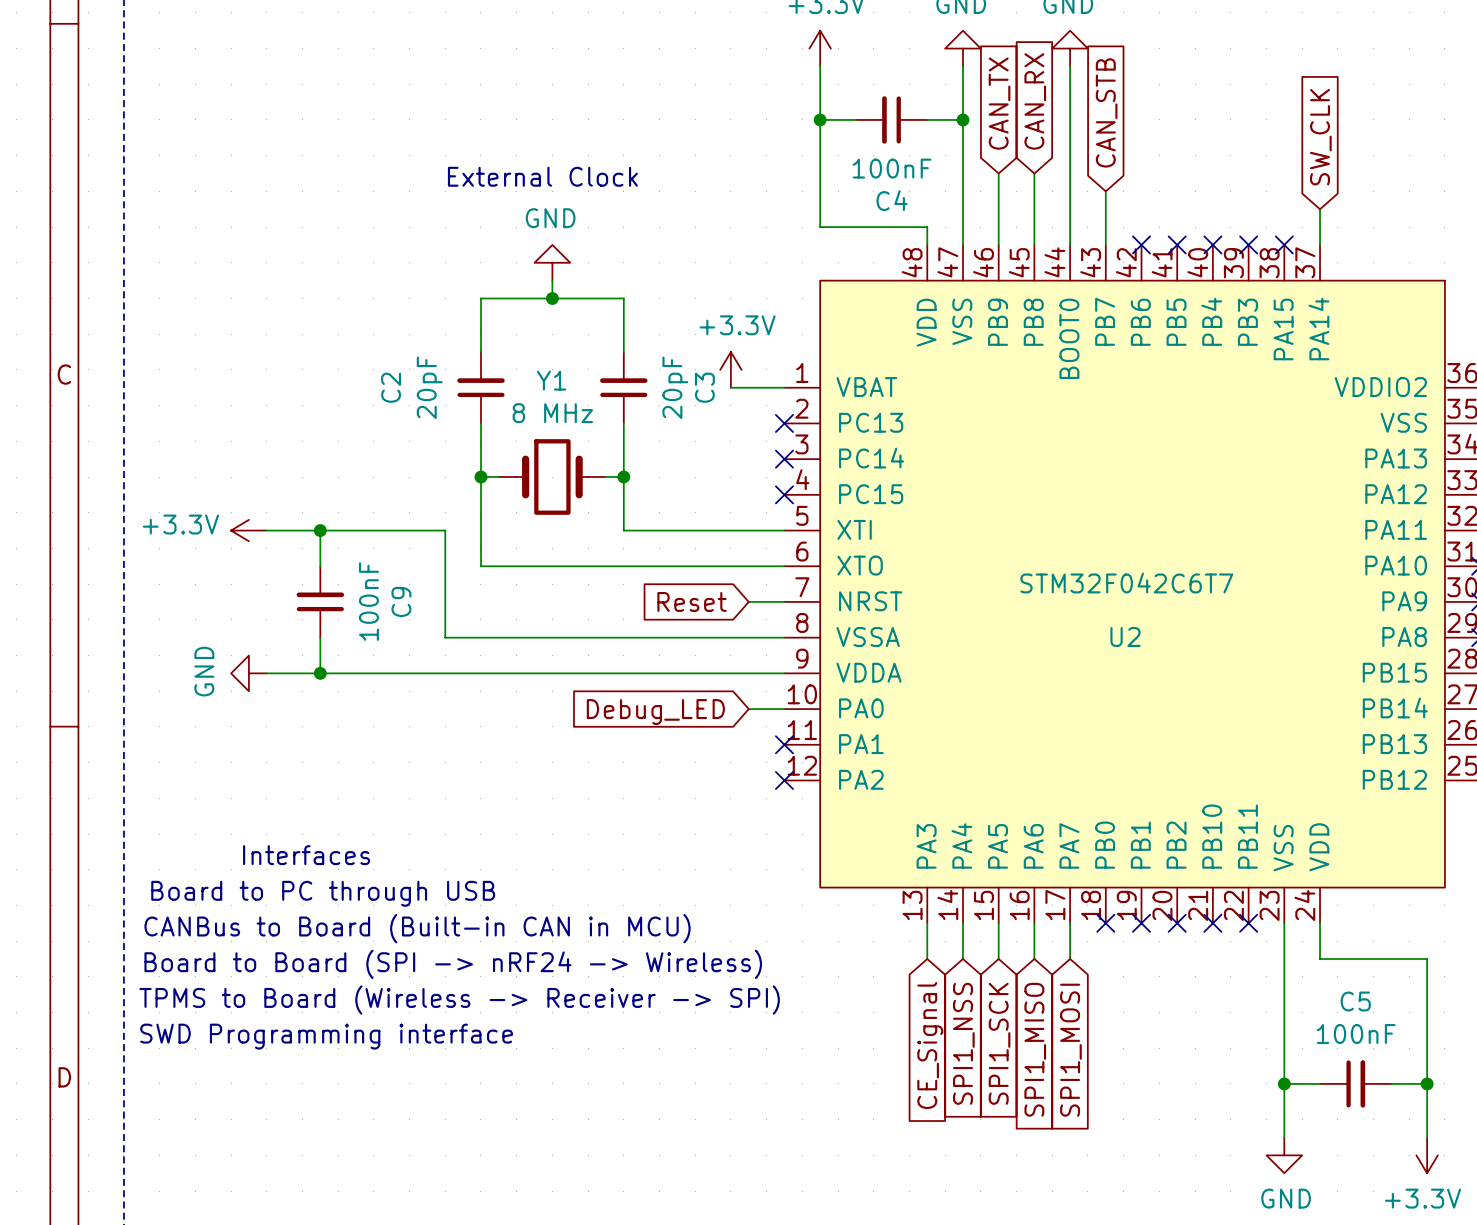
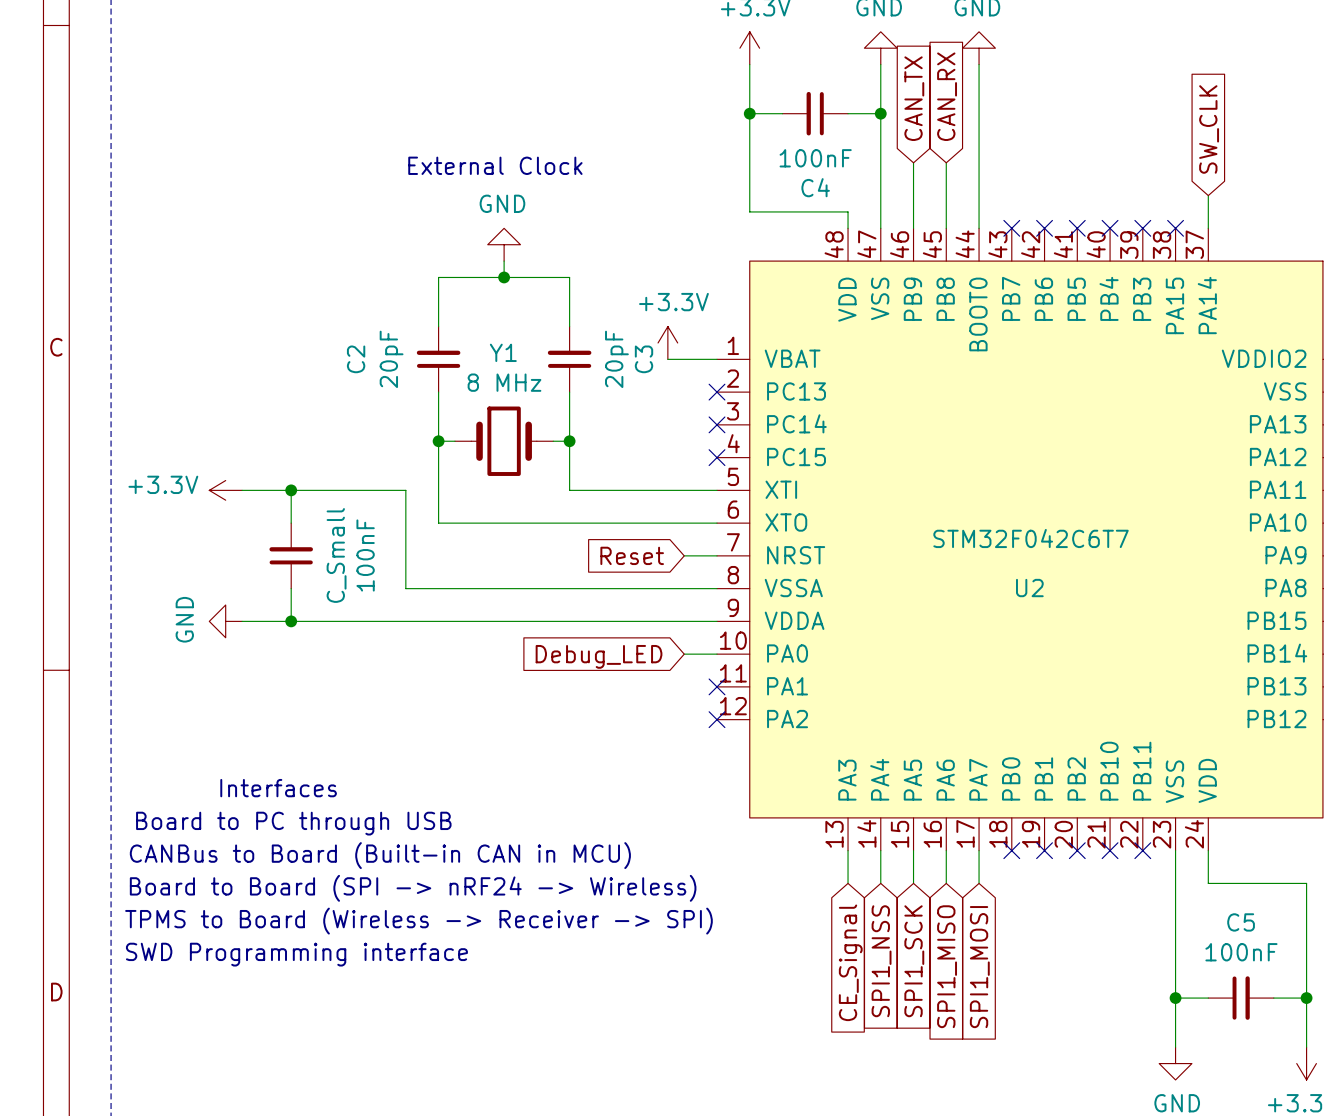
global label: CAN_STB (1106, 112) -> none
wire: (1105, 191) (1105, 244) -> none
no-connect mark: none -> (1011, 228)
C9 value: 100nF (368, 601) -> C_Small (336, 555)
C9 name: C9 (401, 601) -> 100nF (365, 555)

